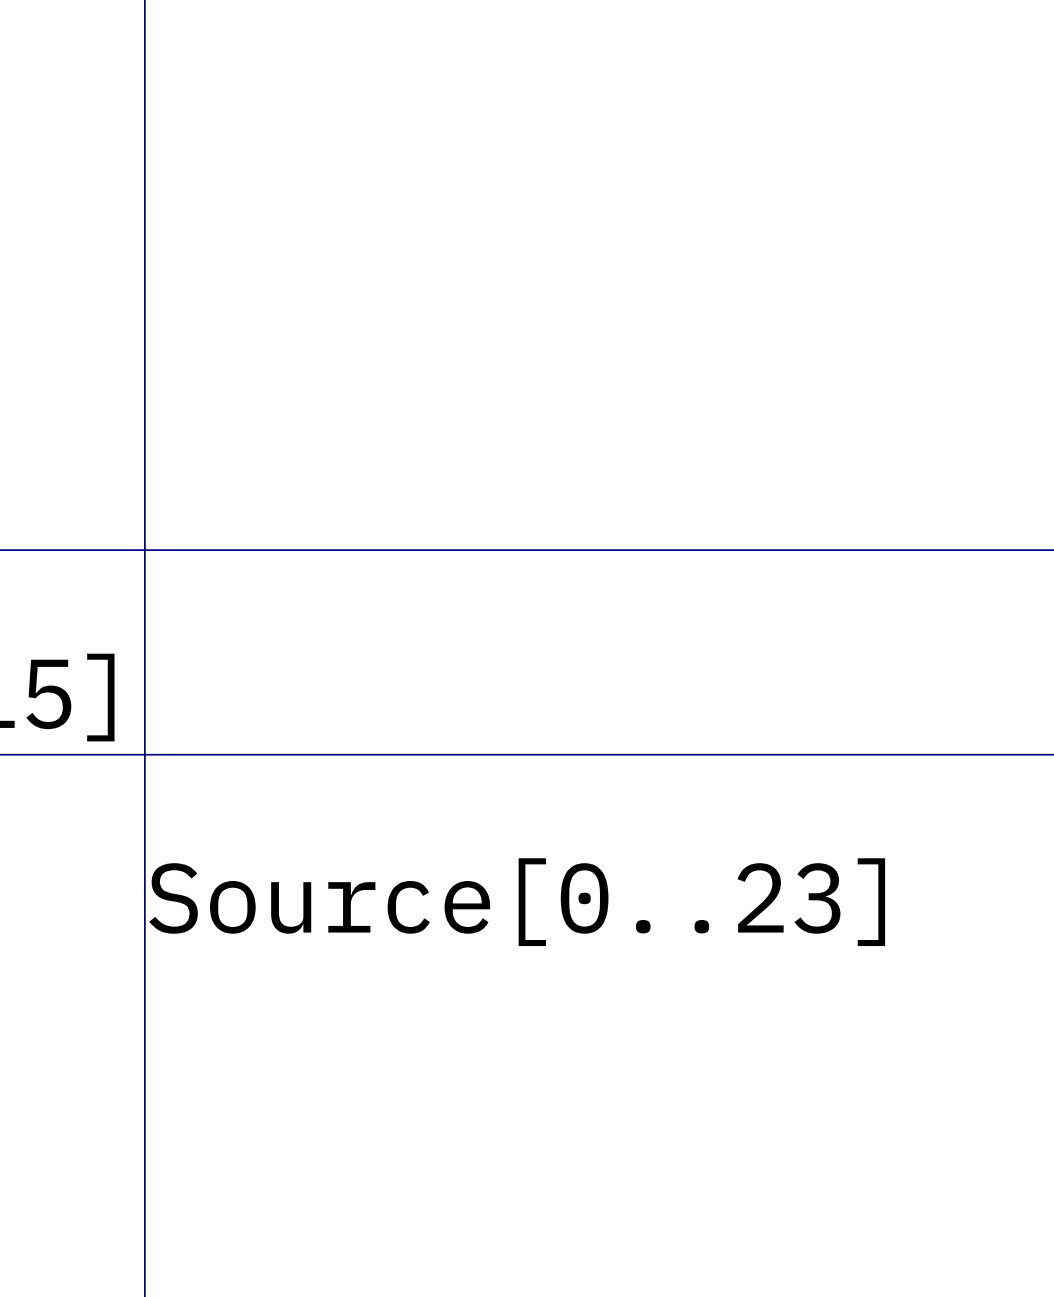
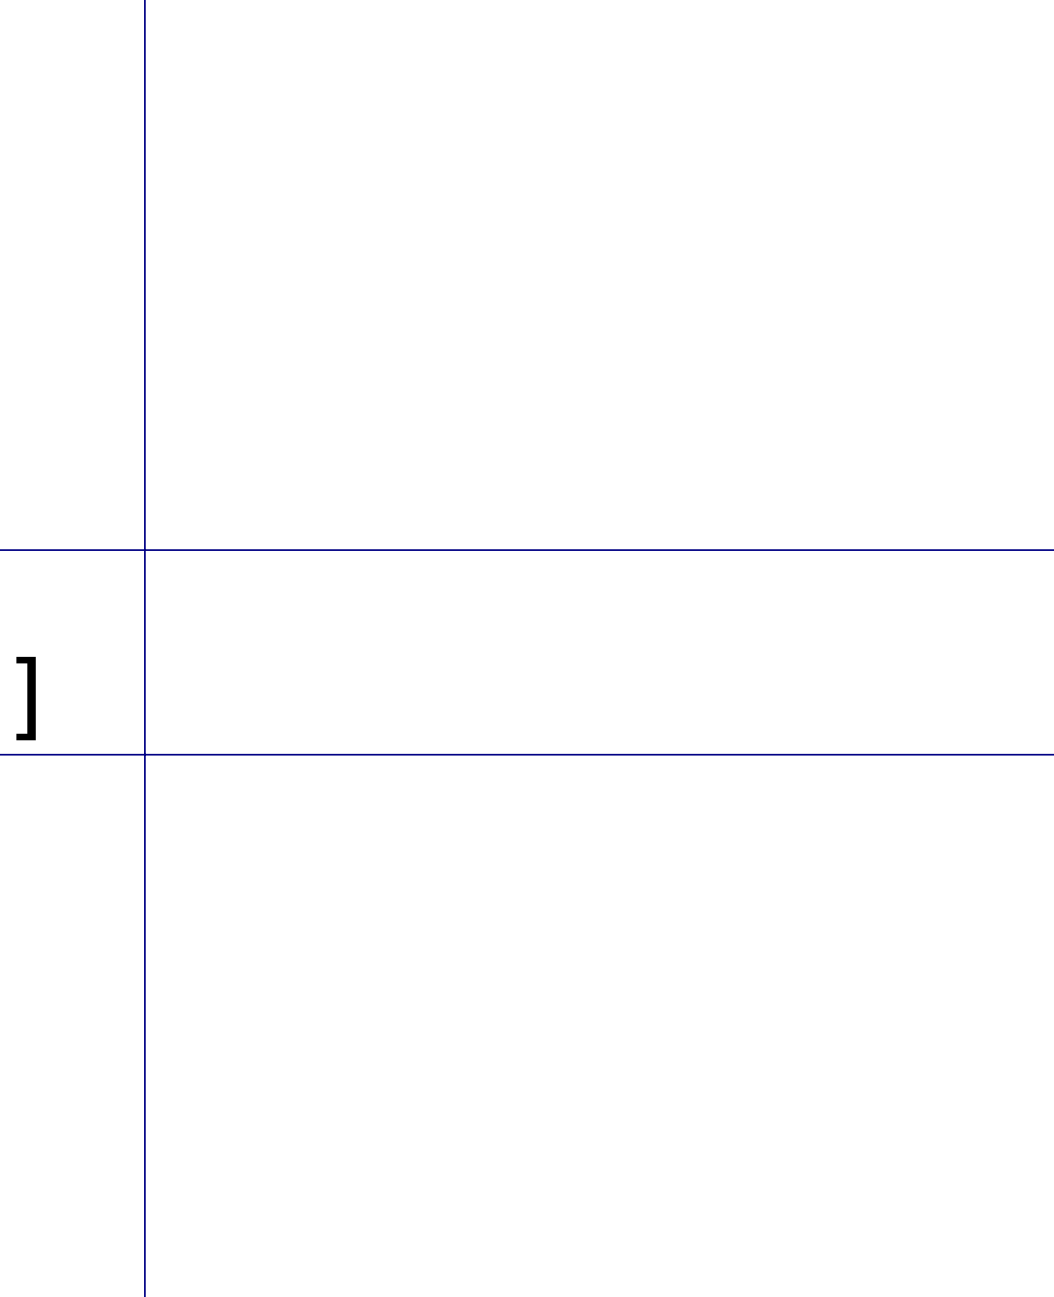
label: Source[0..23] (517, 902) -> none

